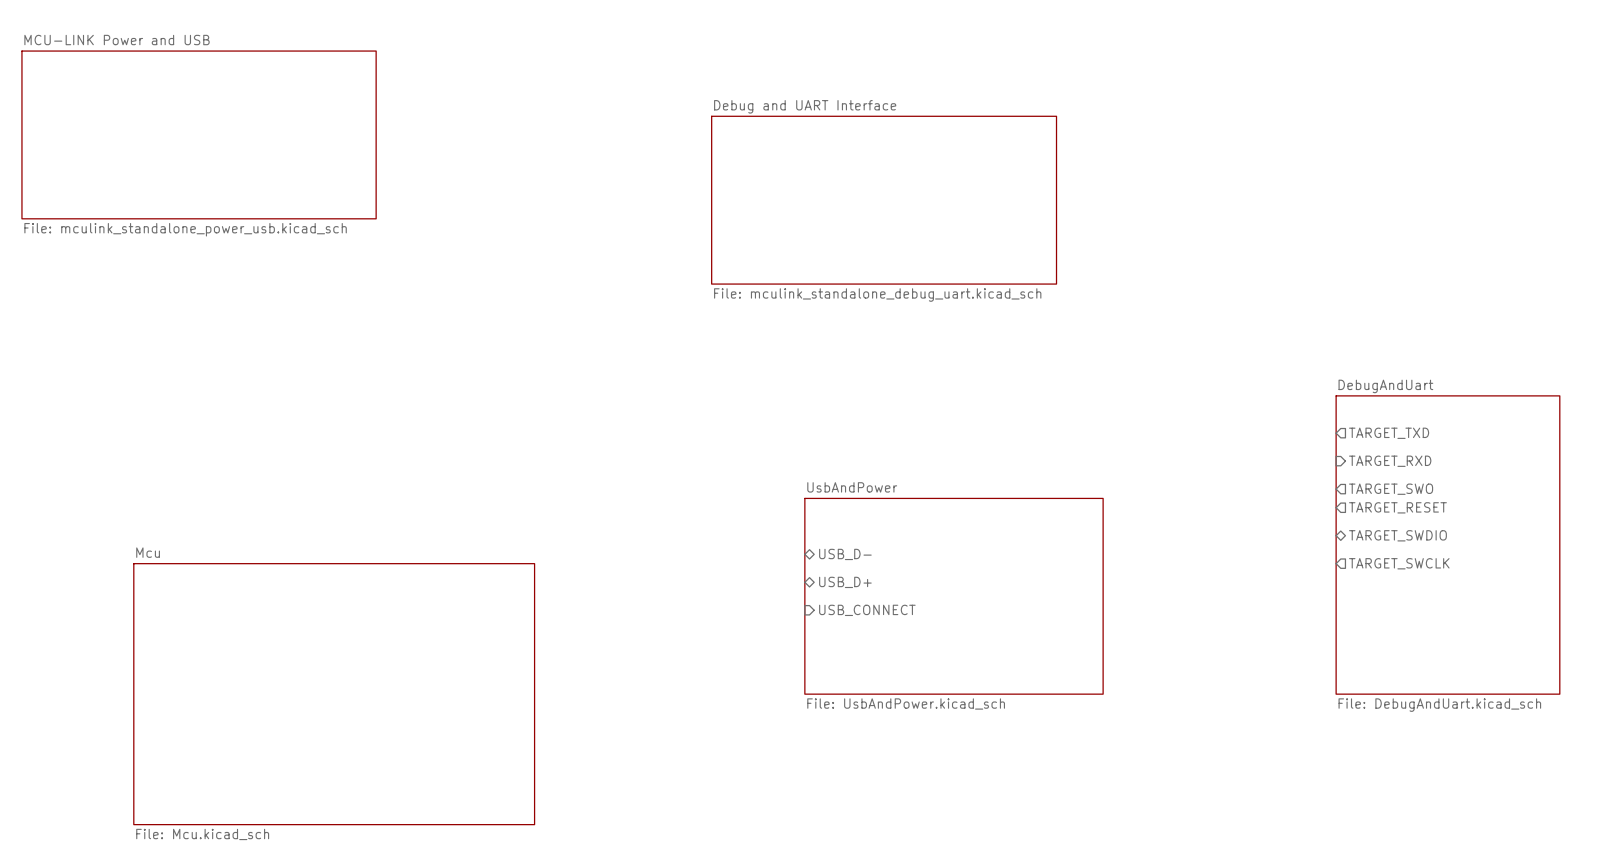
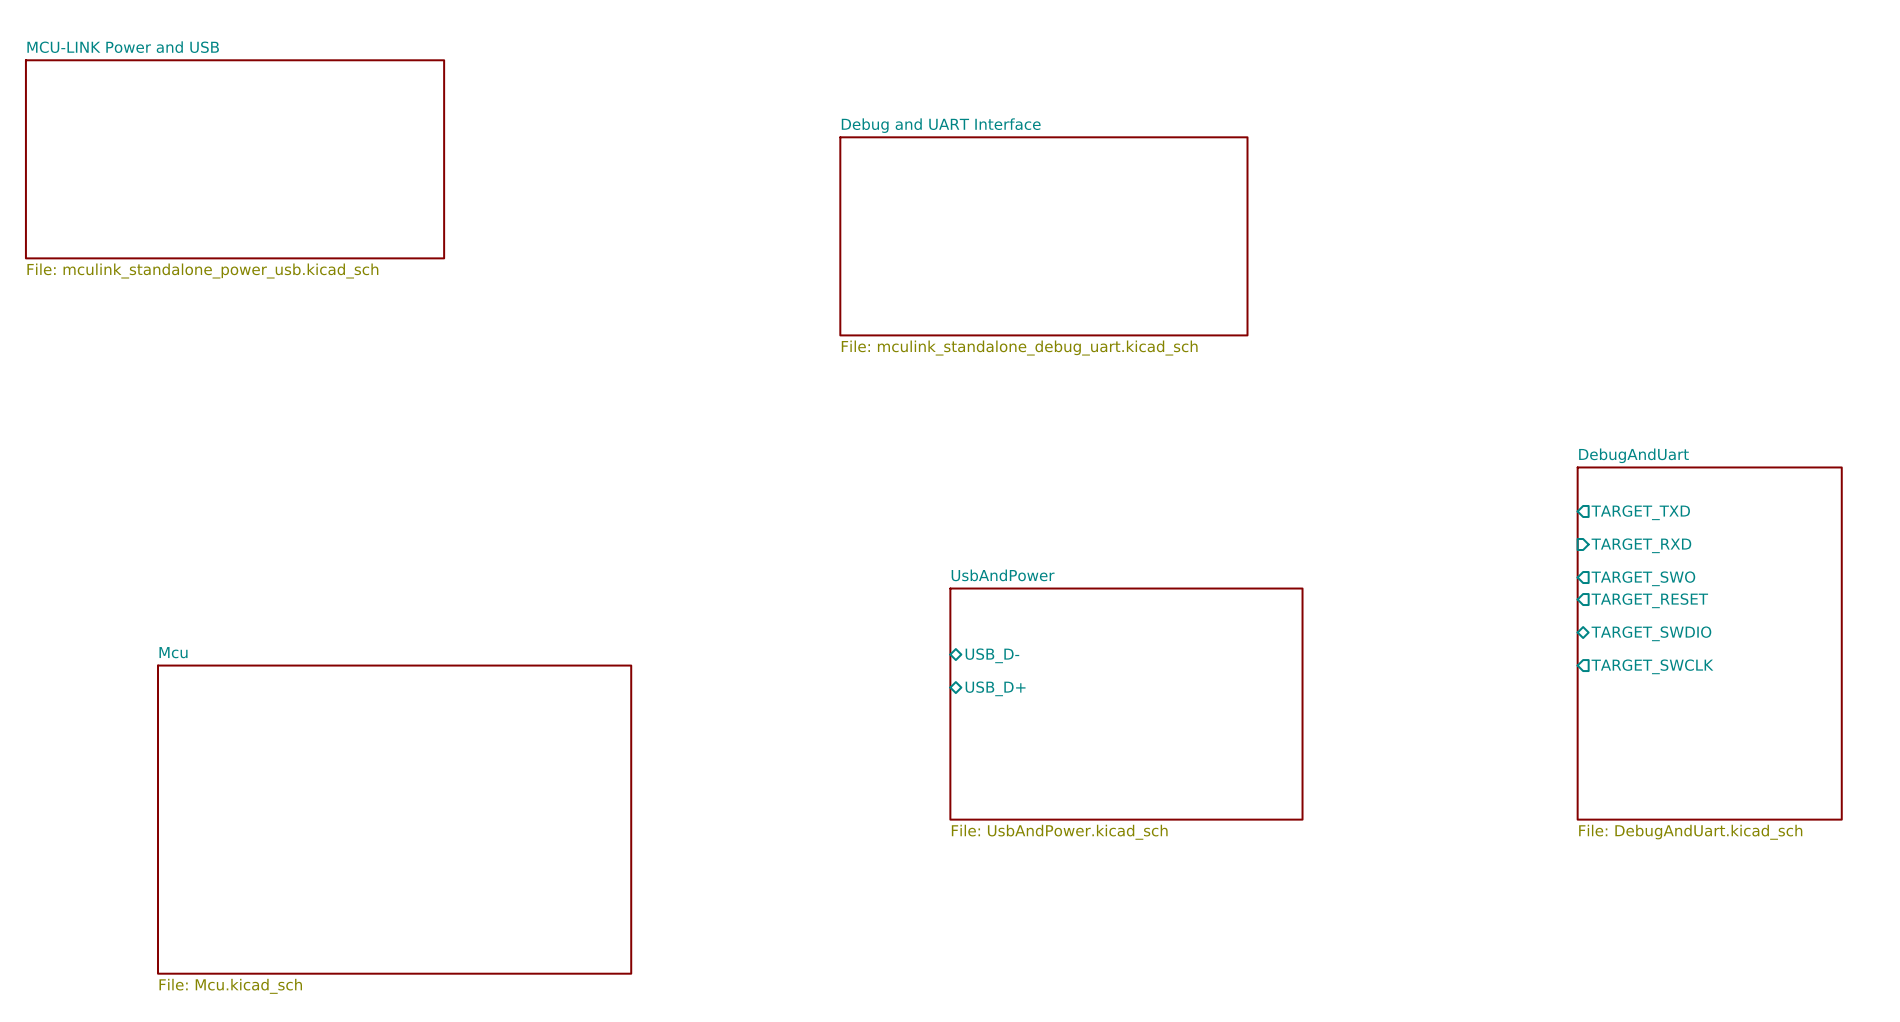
sheet pin: USB_CONNECT (867, 610) -> none

